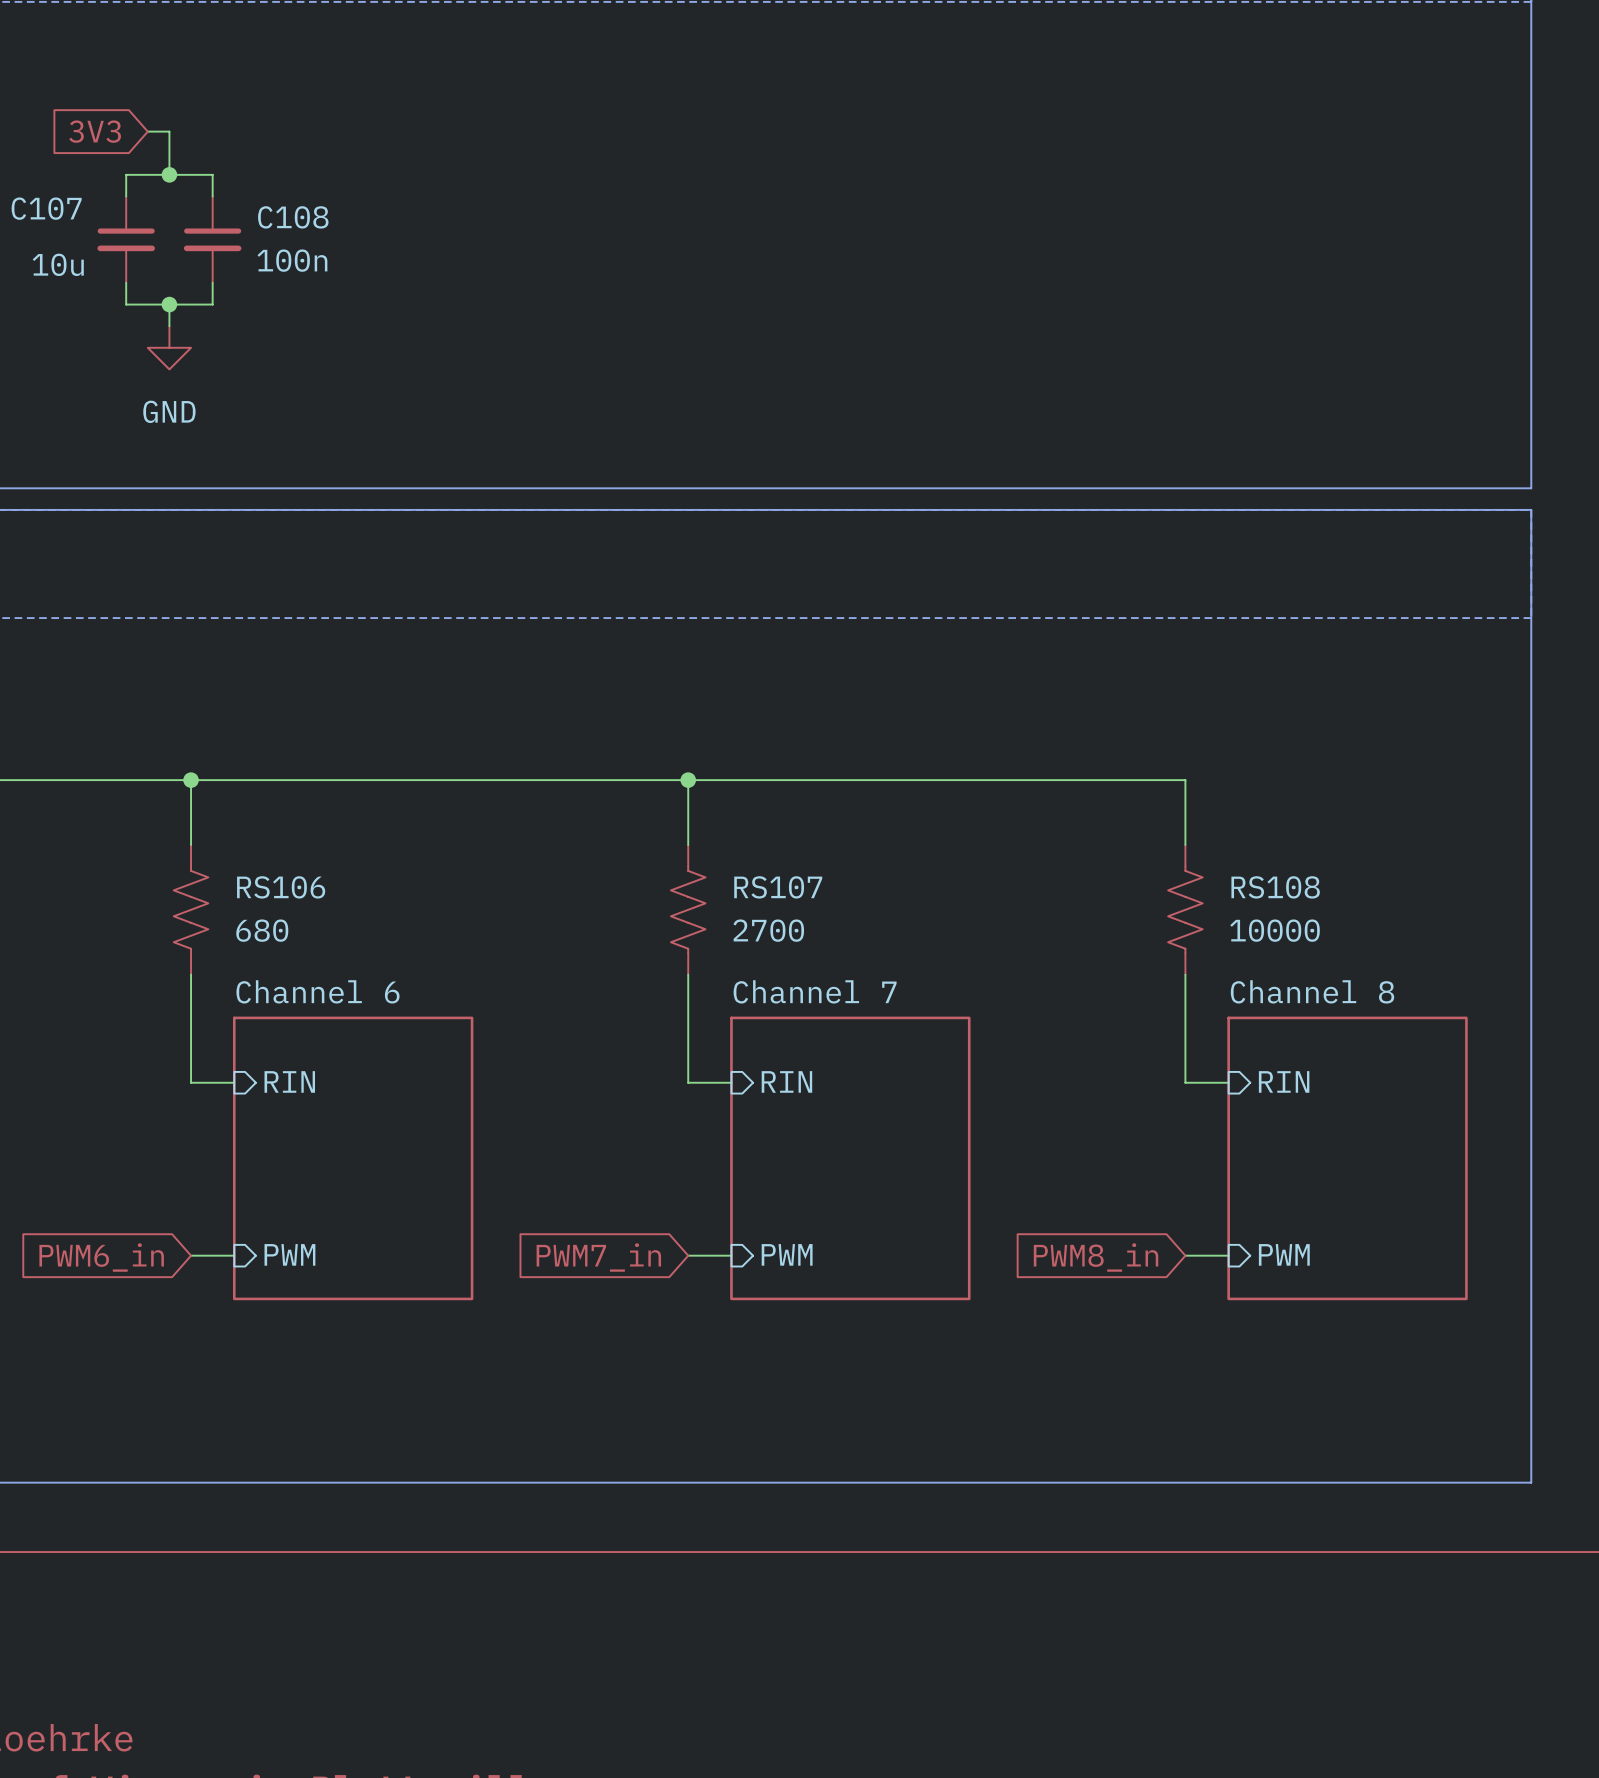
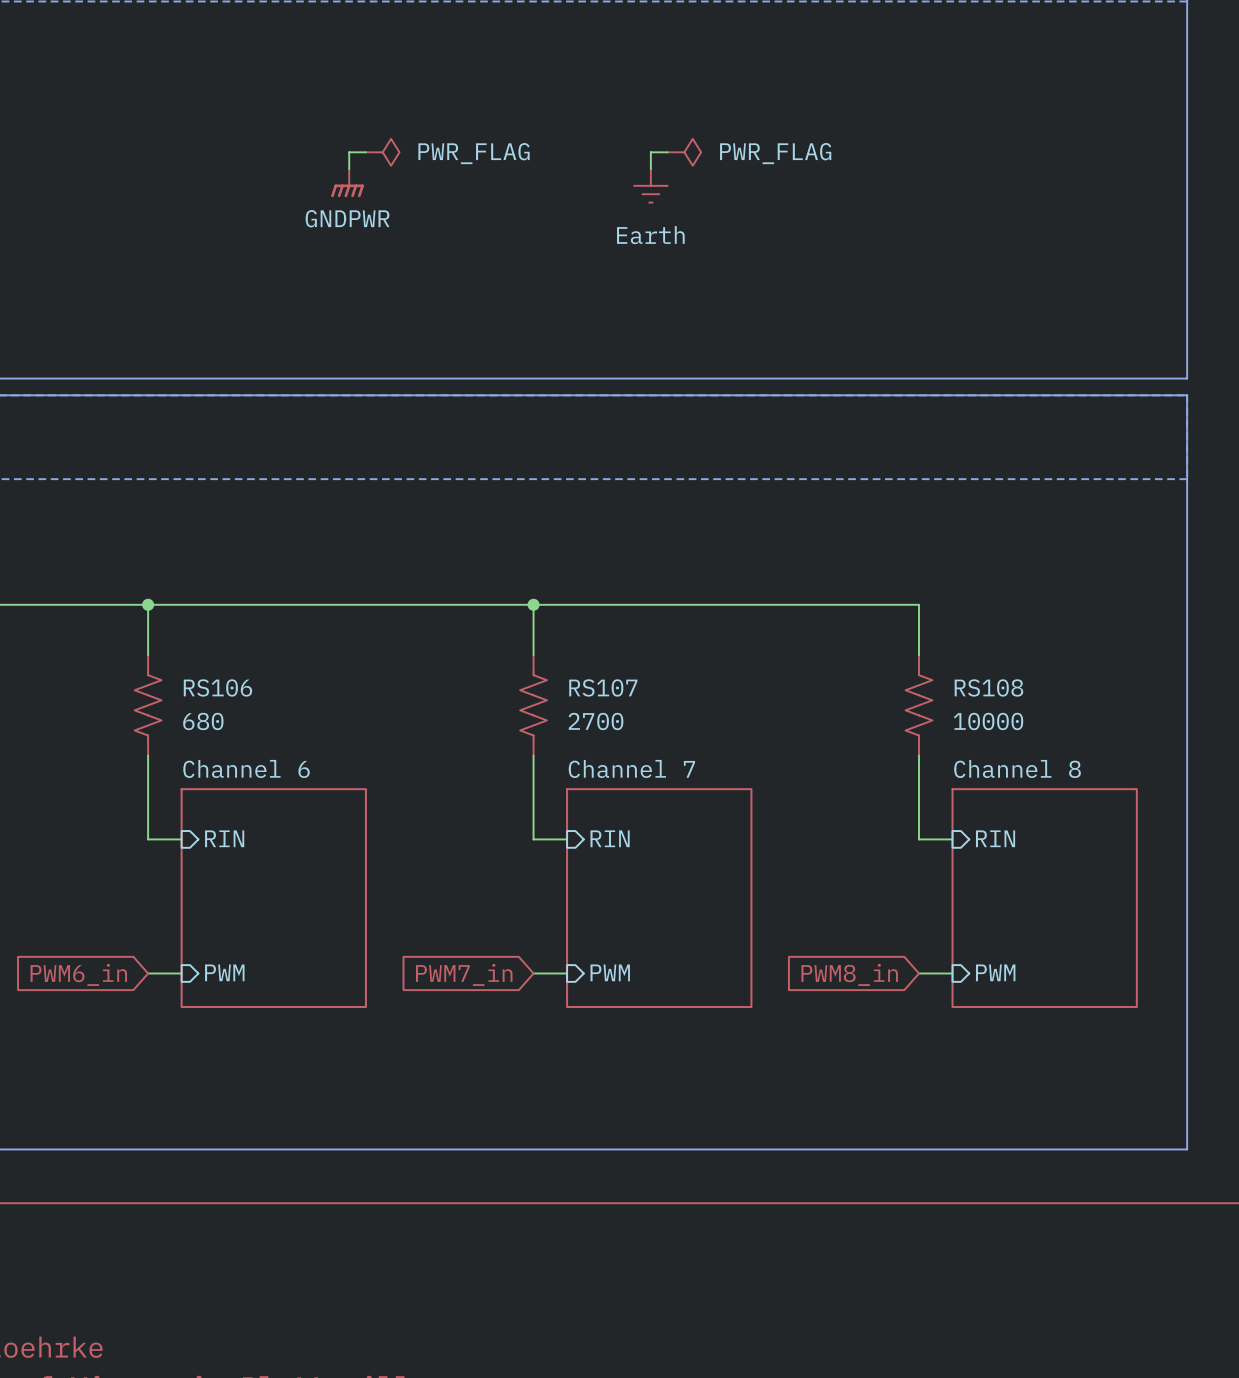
global label: 3V3 (95, 131) -> none
wire: (147, 131) (169, 131) (169, 174) -> none
junction: (169, 174) -> none
wire: (126, 196) (126, 174) (212, 174) (212, 196) -> none
wire: none -> (365, 152) (349, 152) (349, 169)
power symbol: none -> PWR_FLAG (382, 152)
wire: none -> (667, 152) (650, 152) (650, 169)
power symbol: none -> PWR_FLAG (684, 152)
power symbol: none -> GNDPWR (347, 183)
C107: 10u (126, 239) -> none
C108: 100n (212, 239) -> none
power symbol: none -> Earth (650, 185)
wire: (126, 282) (126, 304) (212, 304) (212, 282) -> none
wire: (169, 304) (169, 326) -> none
junction: (169, 304) -> none
power symbol: GND (169, 347) -> none

